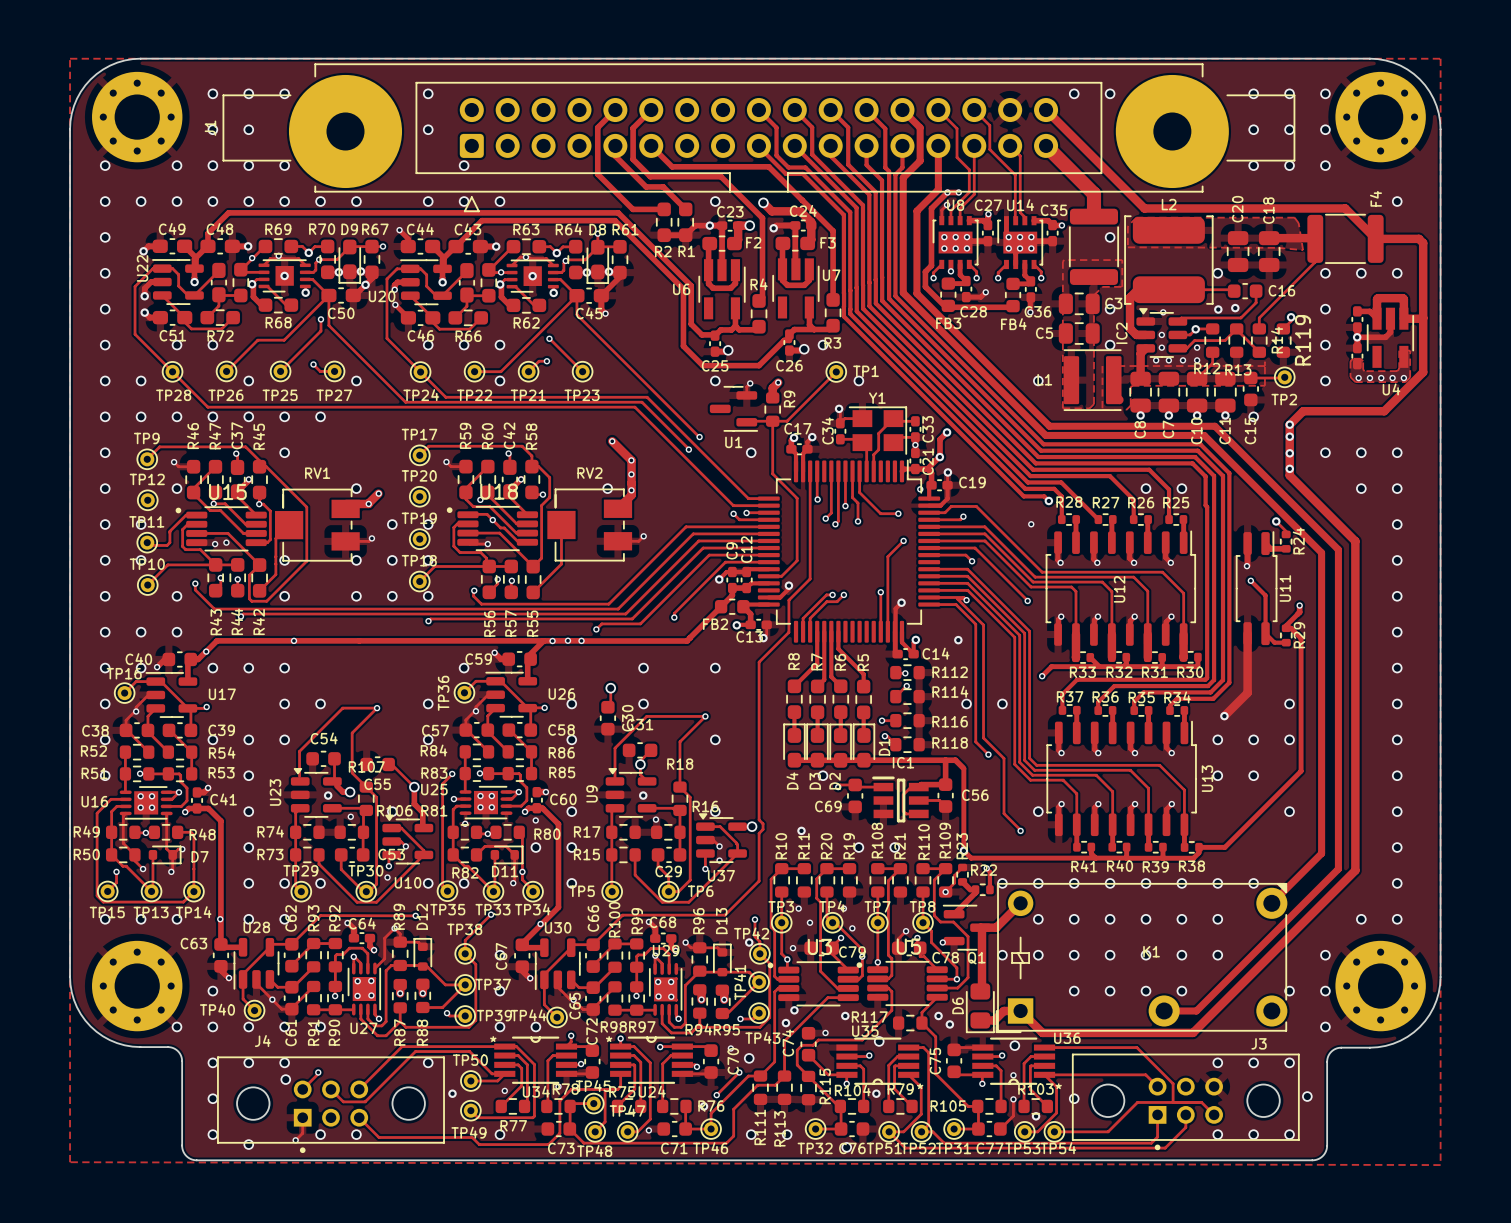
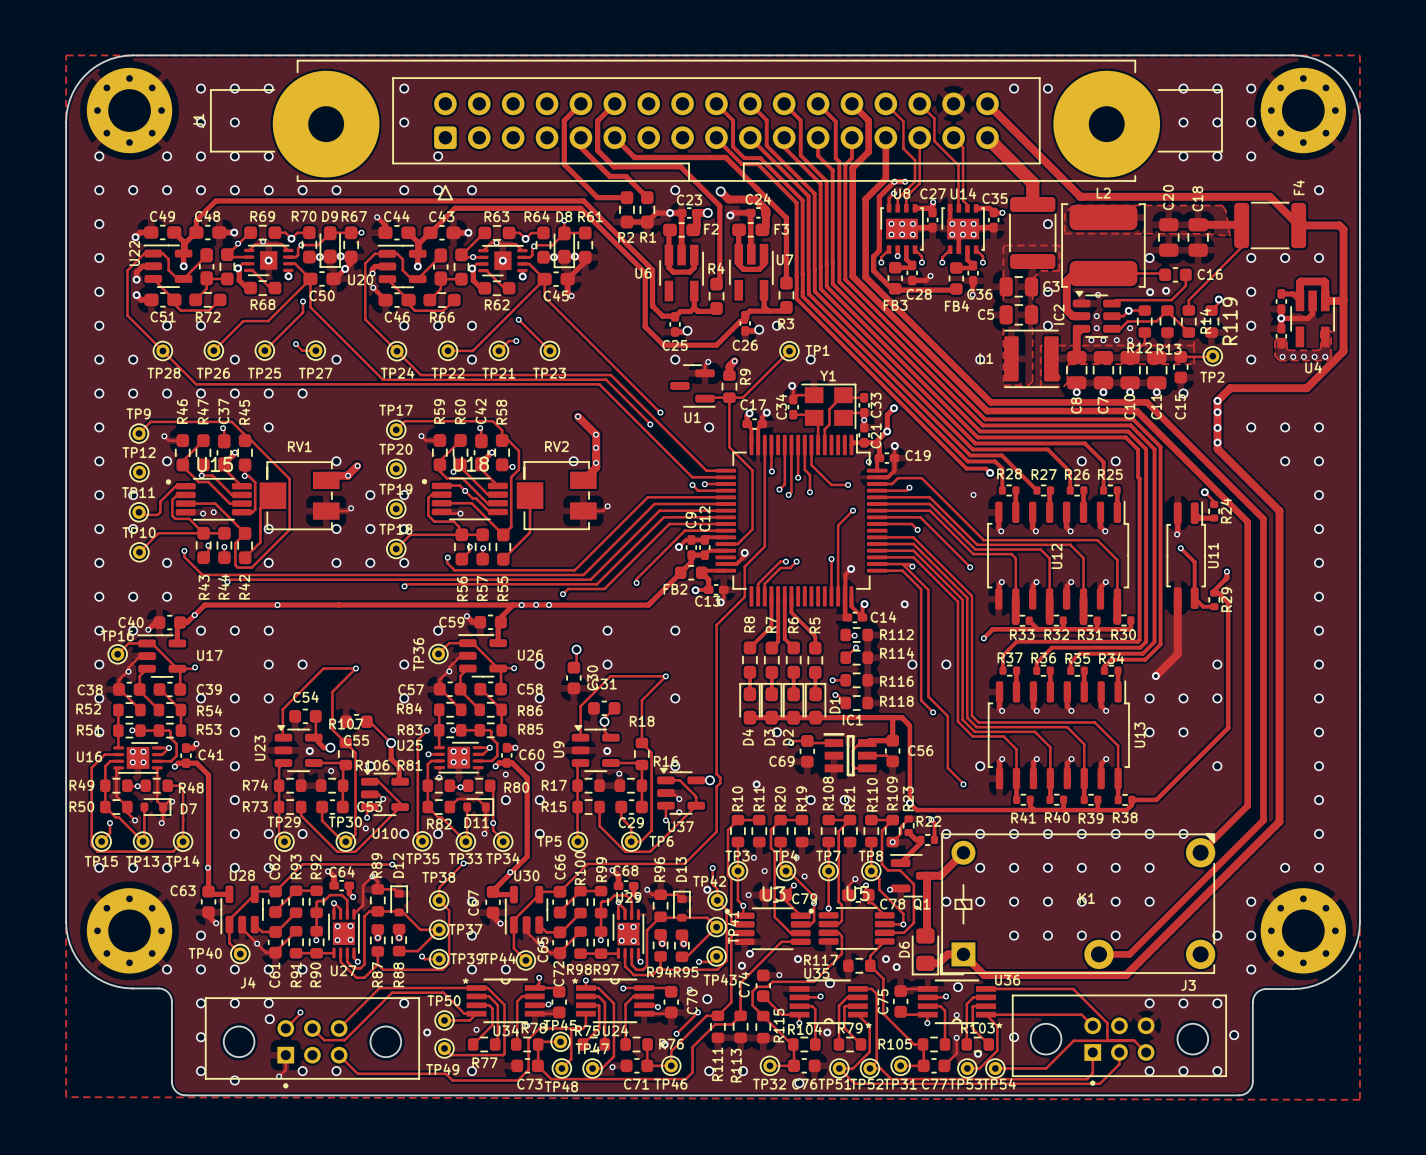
TP41 name position: TP41 (740, 982) -> TP41 (733, 927)

